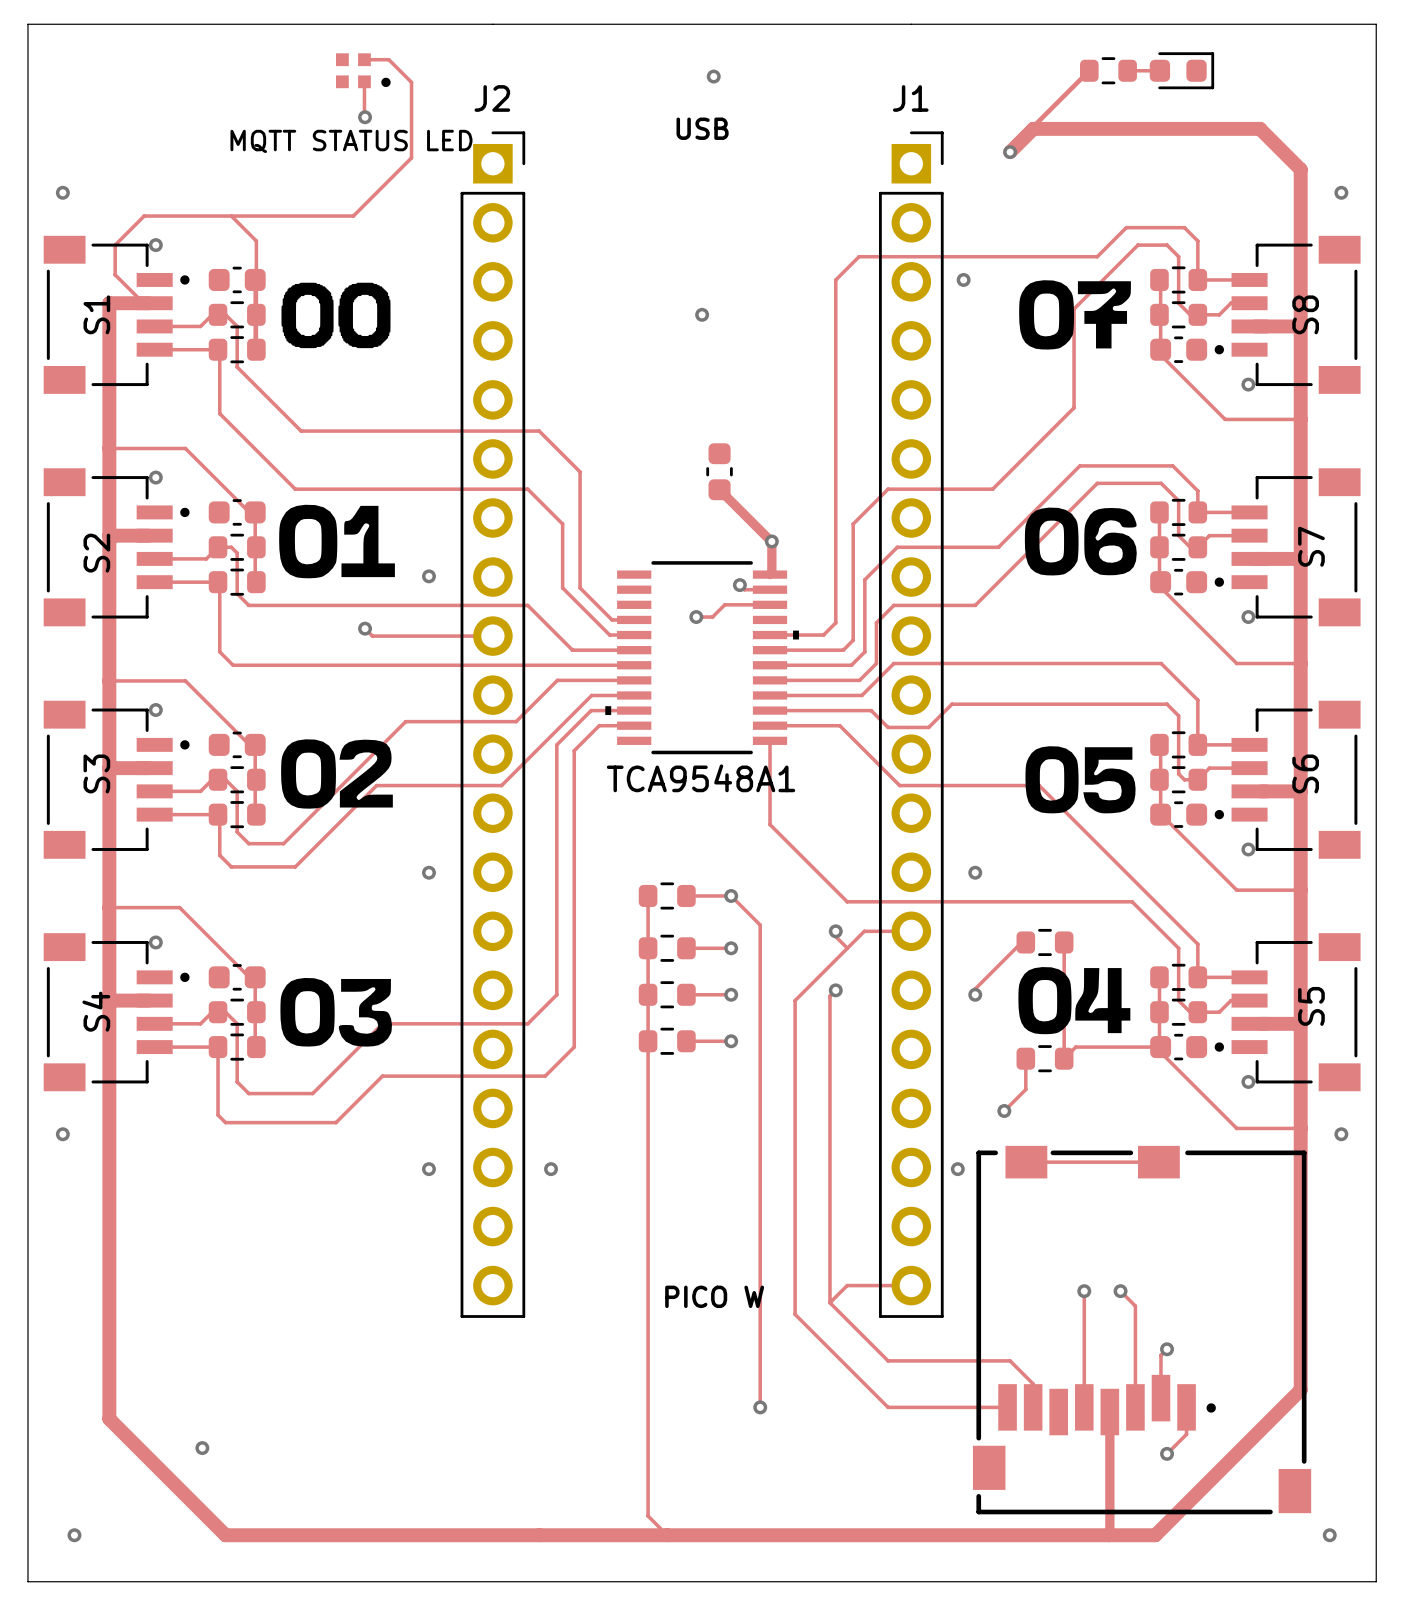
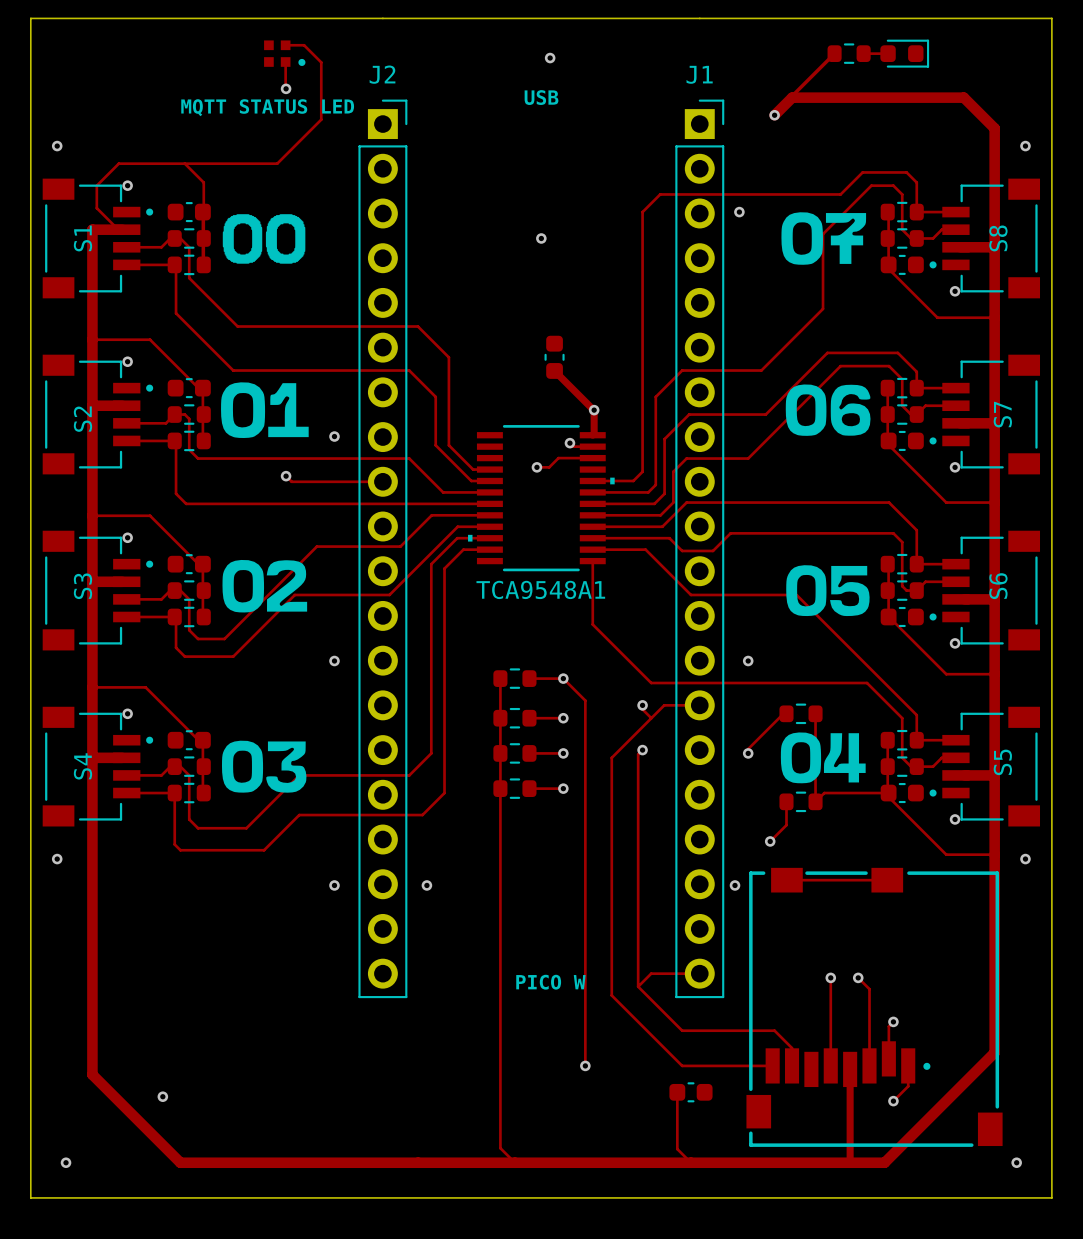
track: none -> (677, 1092) (677, 1149) (690, 1162)
part: none -> (690, 1092)

